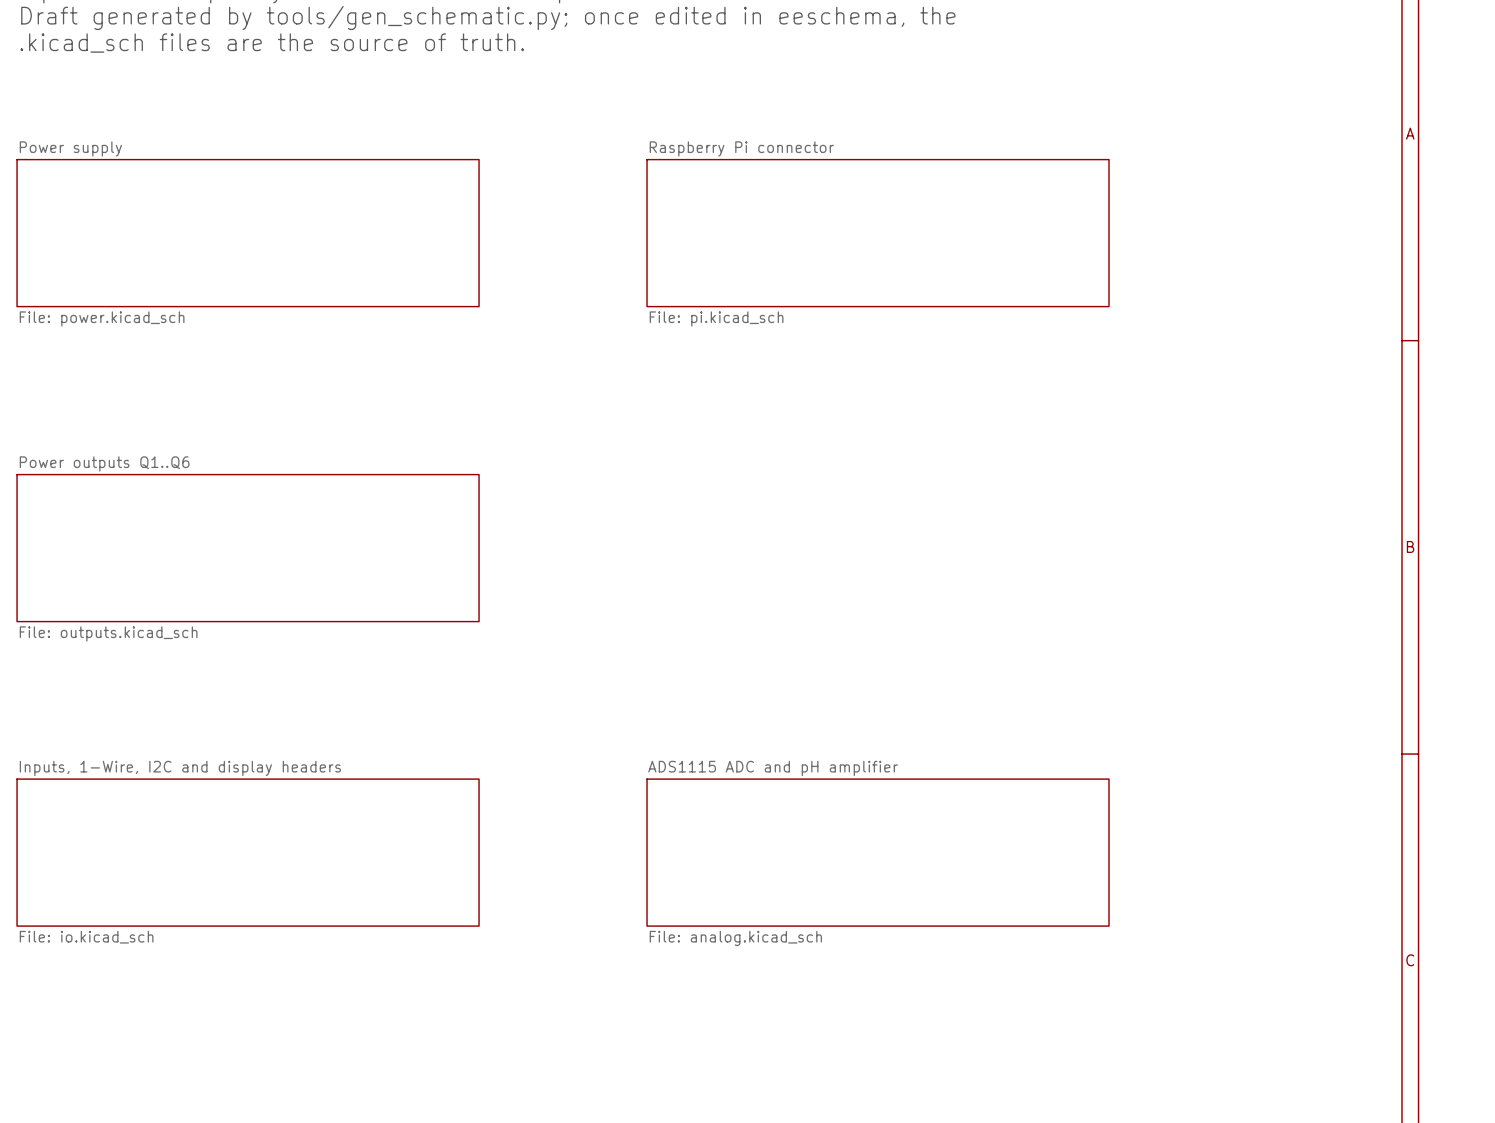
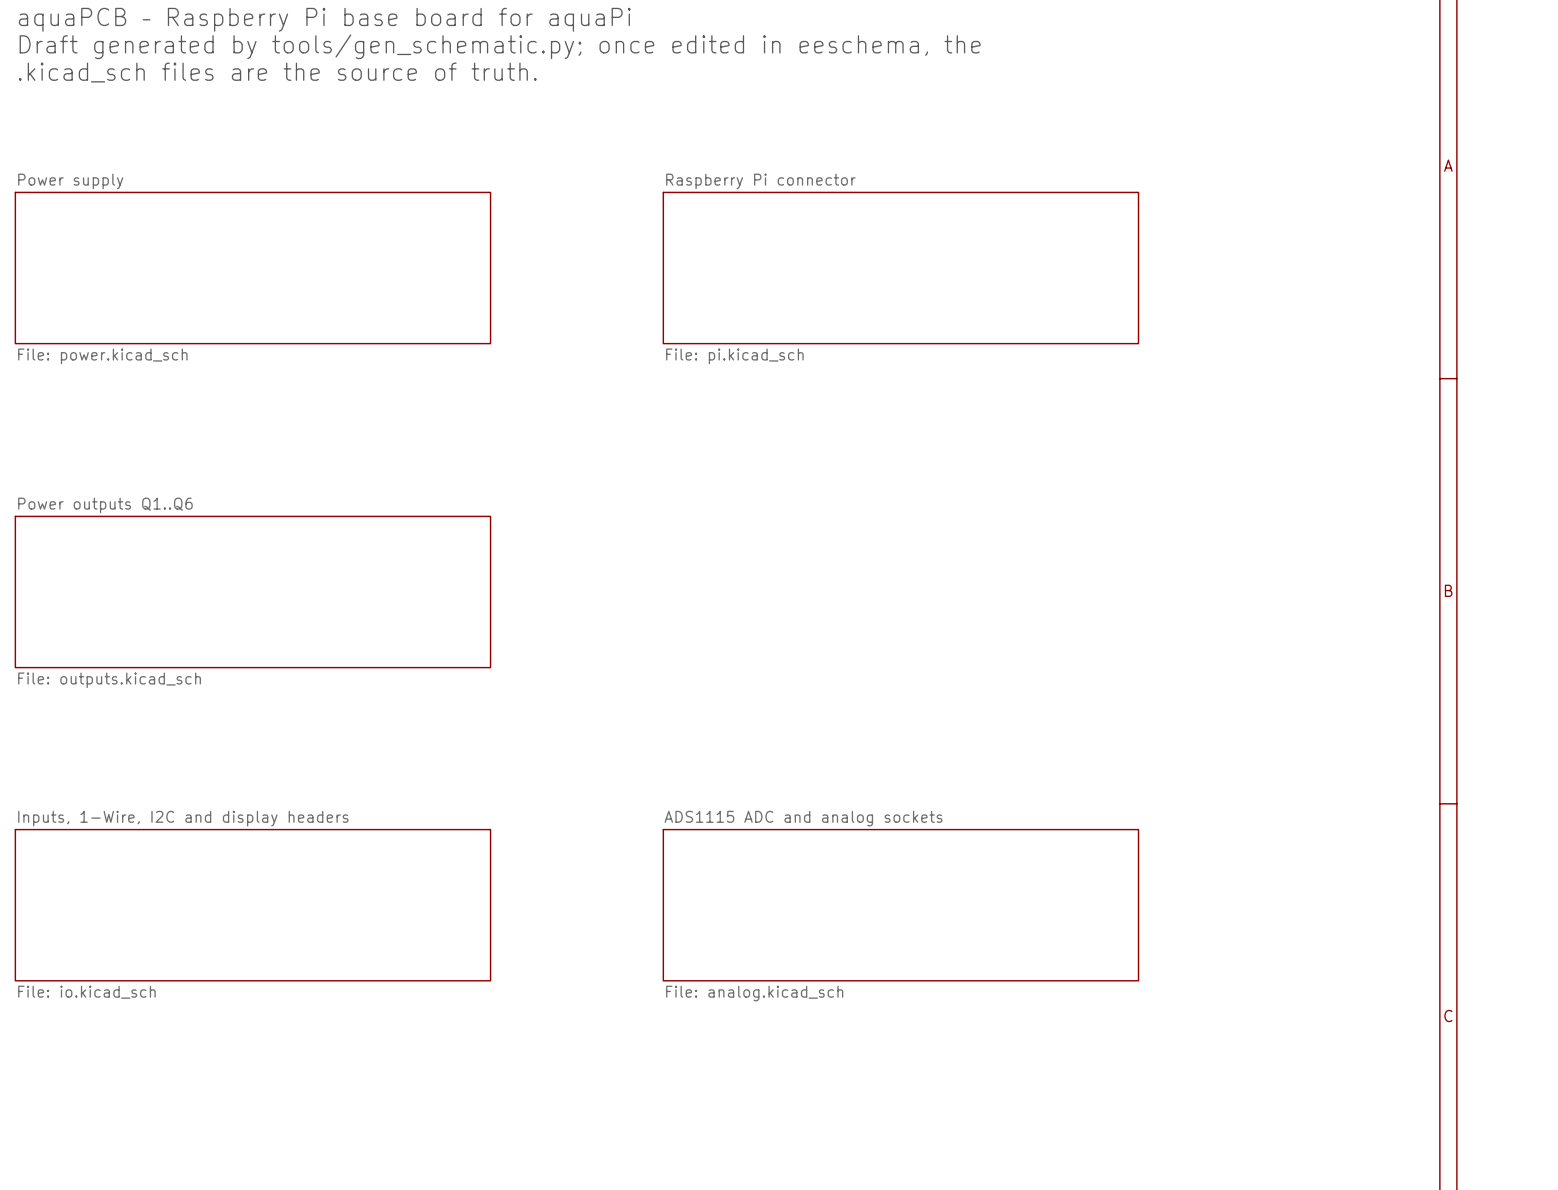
sheet ADS1115 ADC and pH amplifier name: ADS1115 ADC and pH amplifier (773, 768) -> ADS1115 ADC and analog sockets (803, 818)

